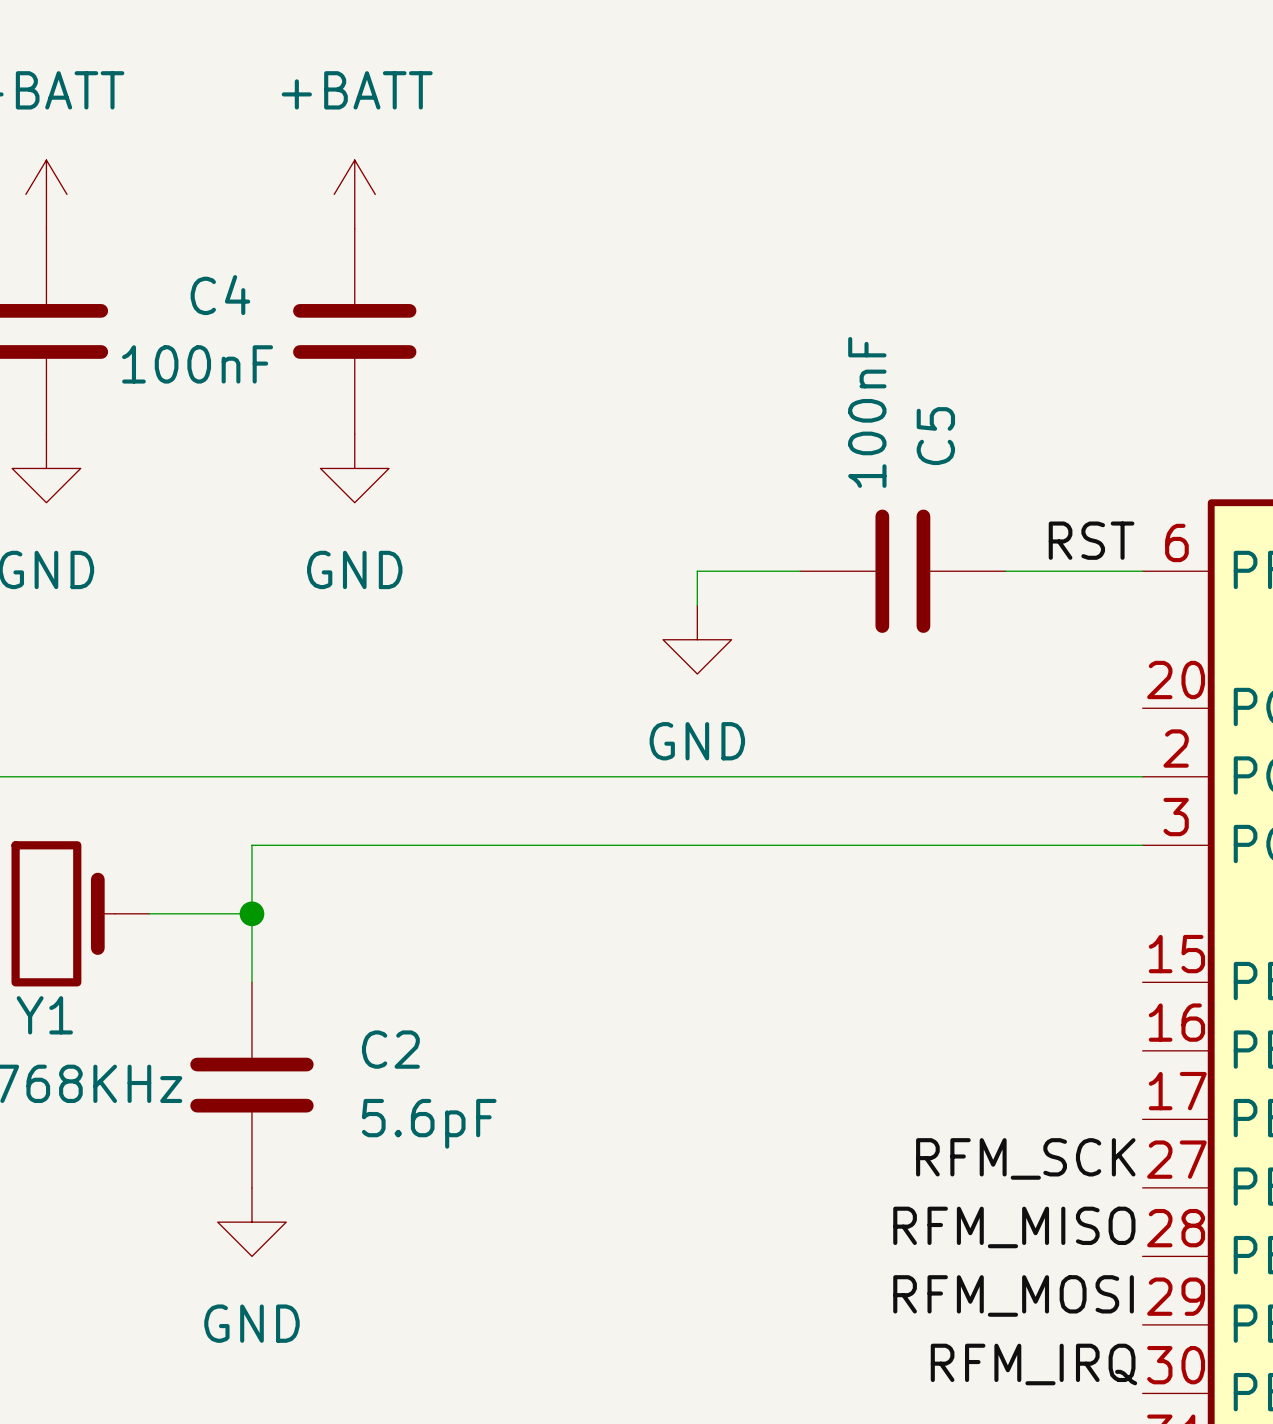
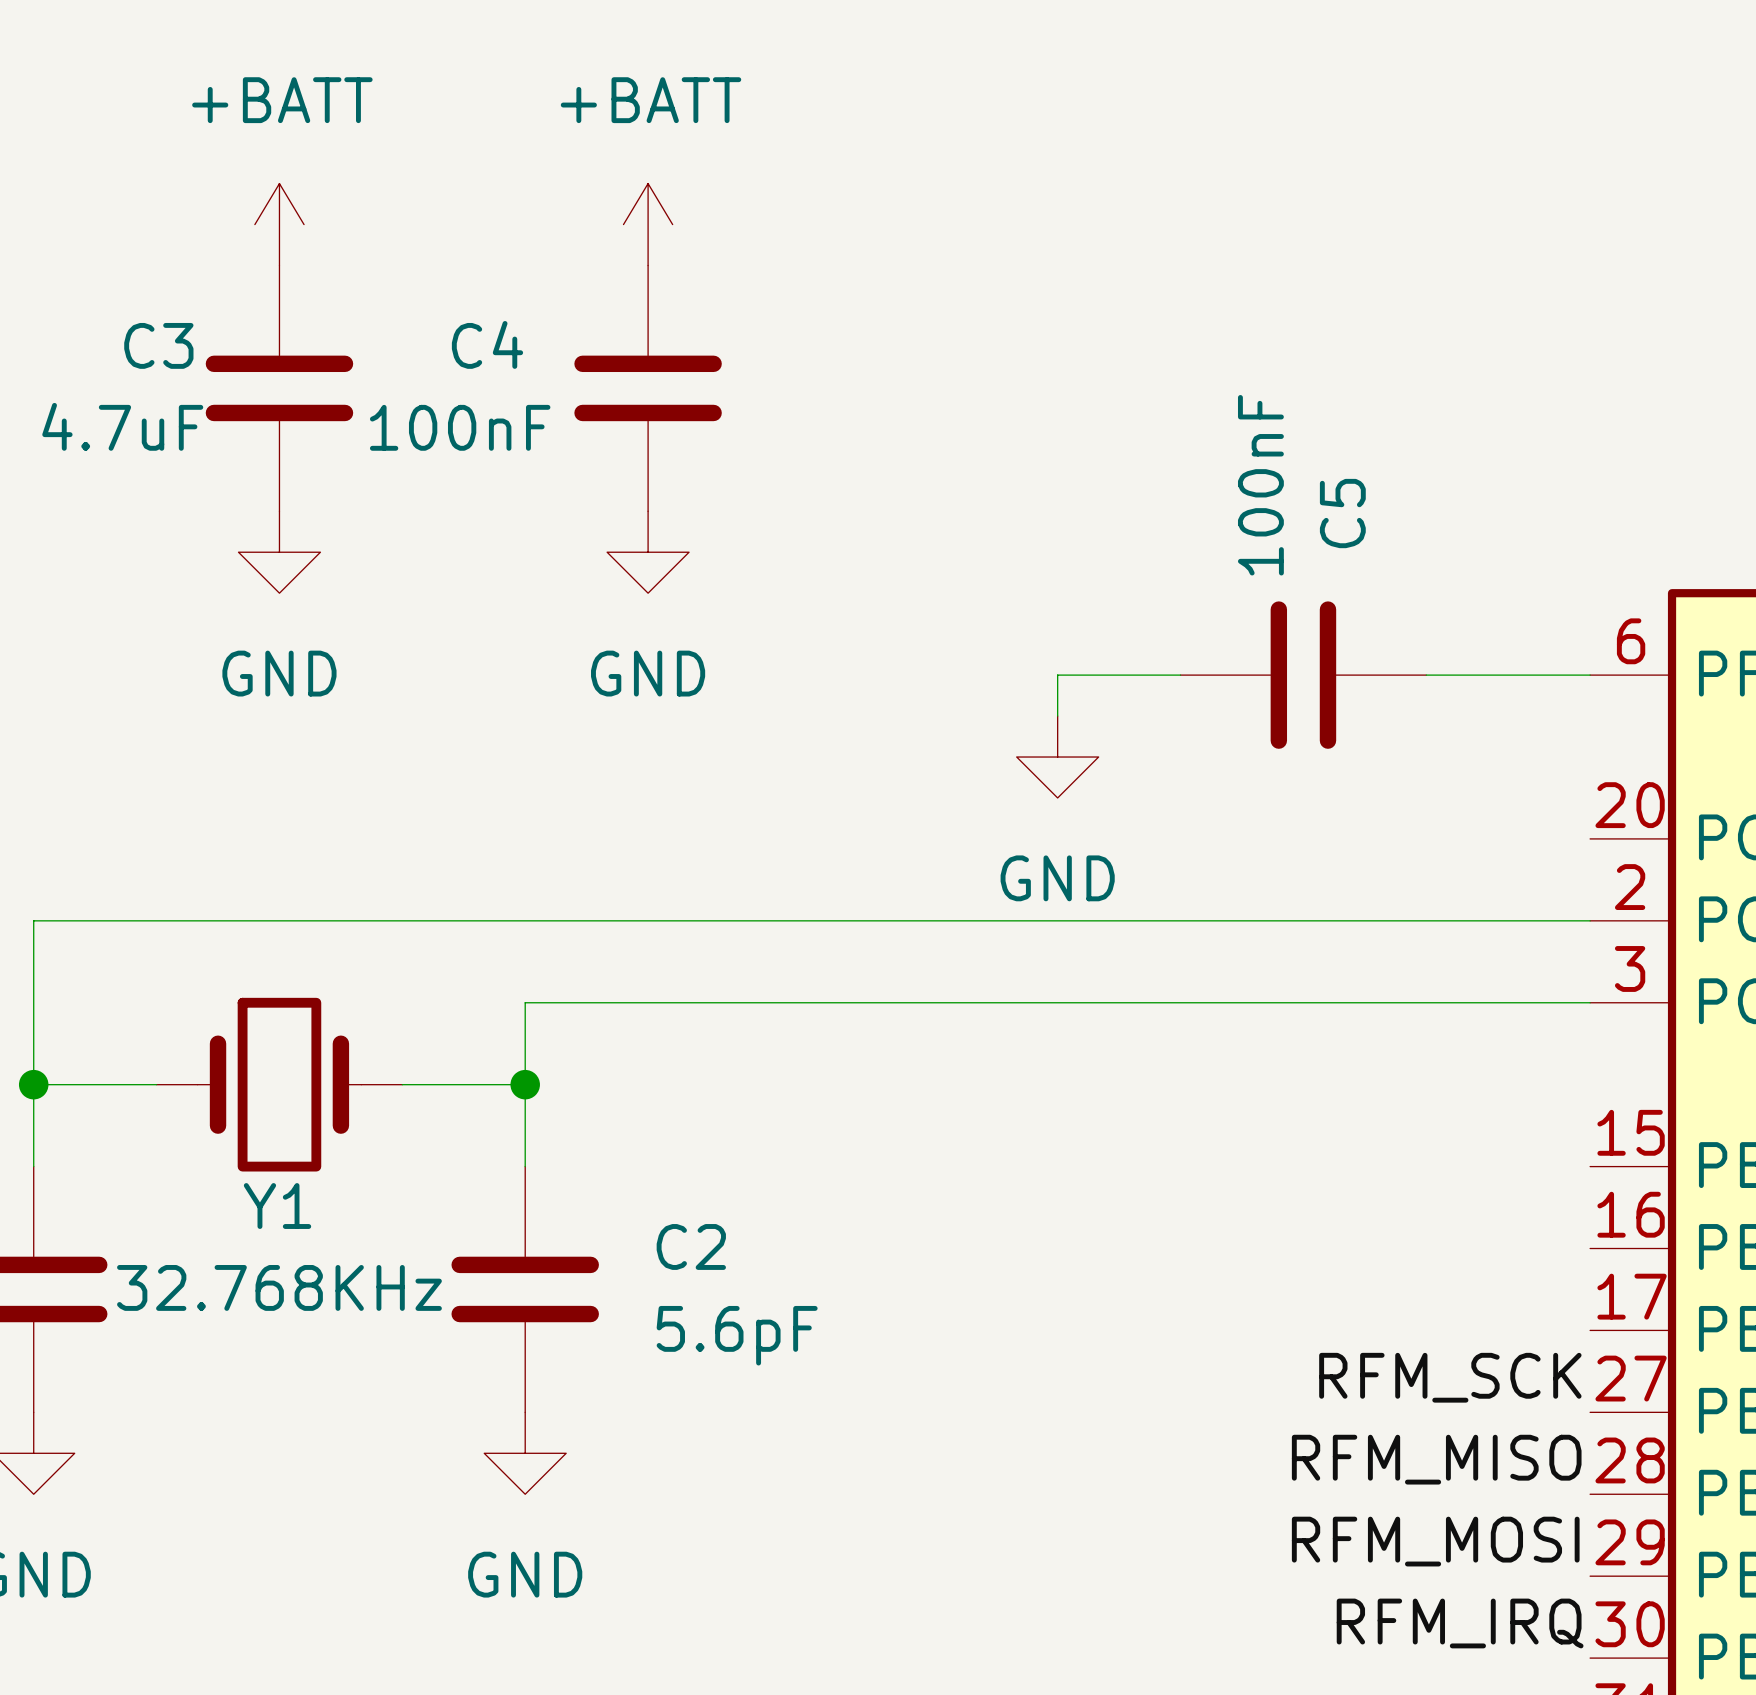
label: RST (1091, 540) -> none

